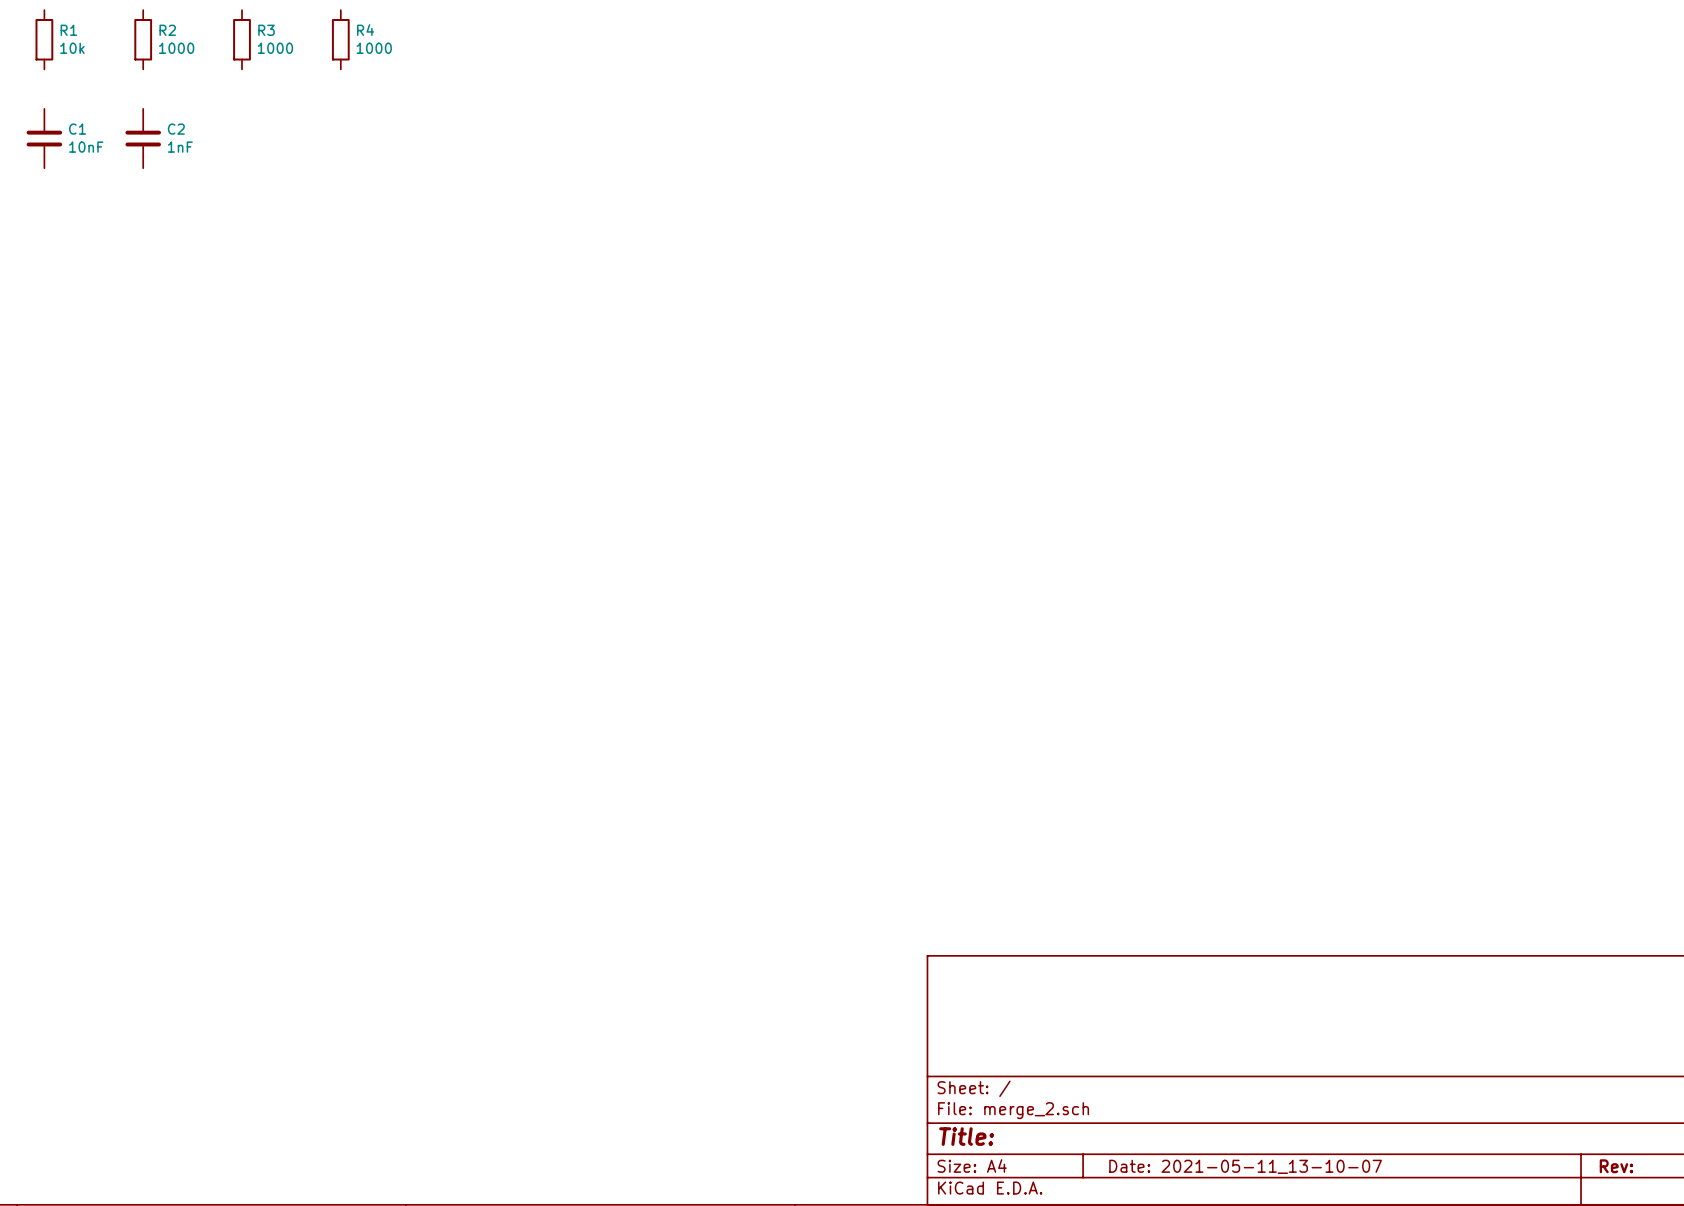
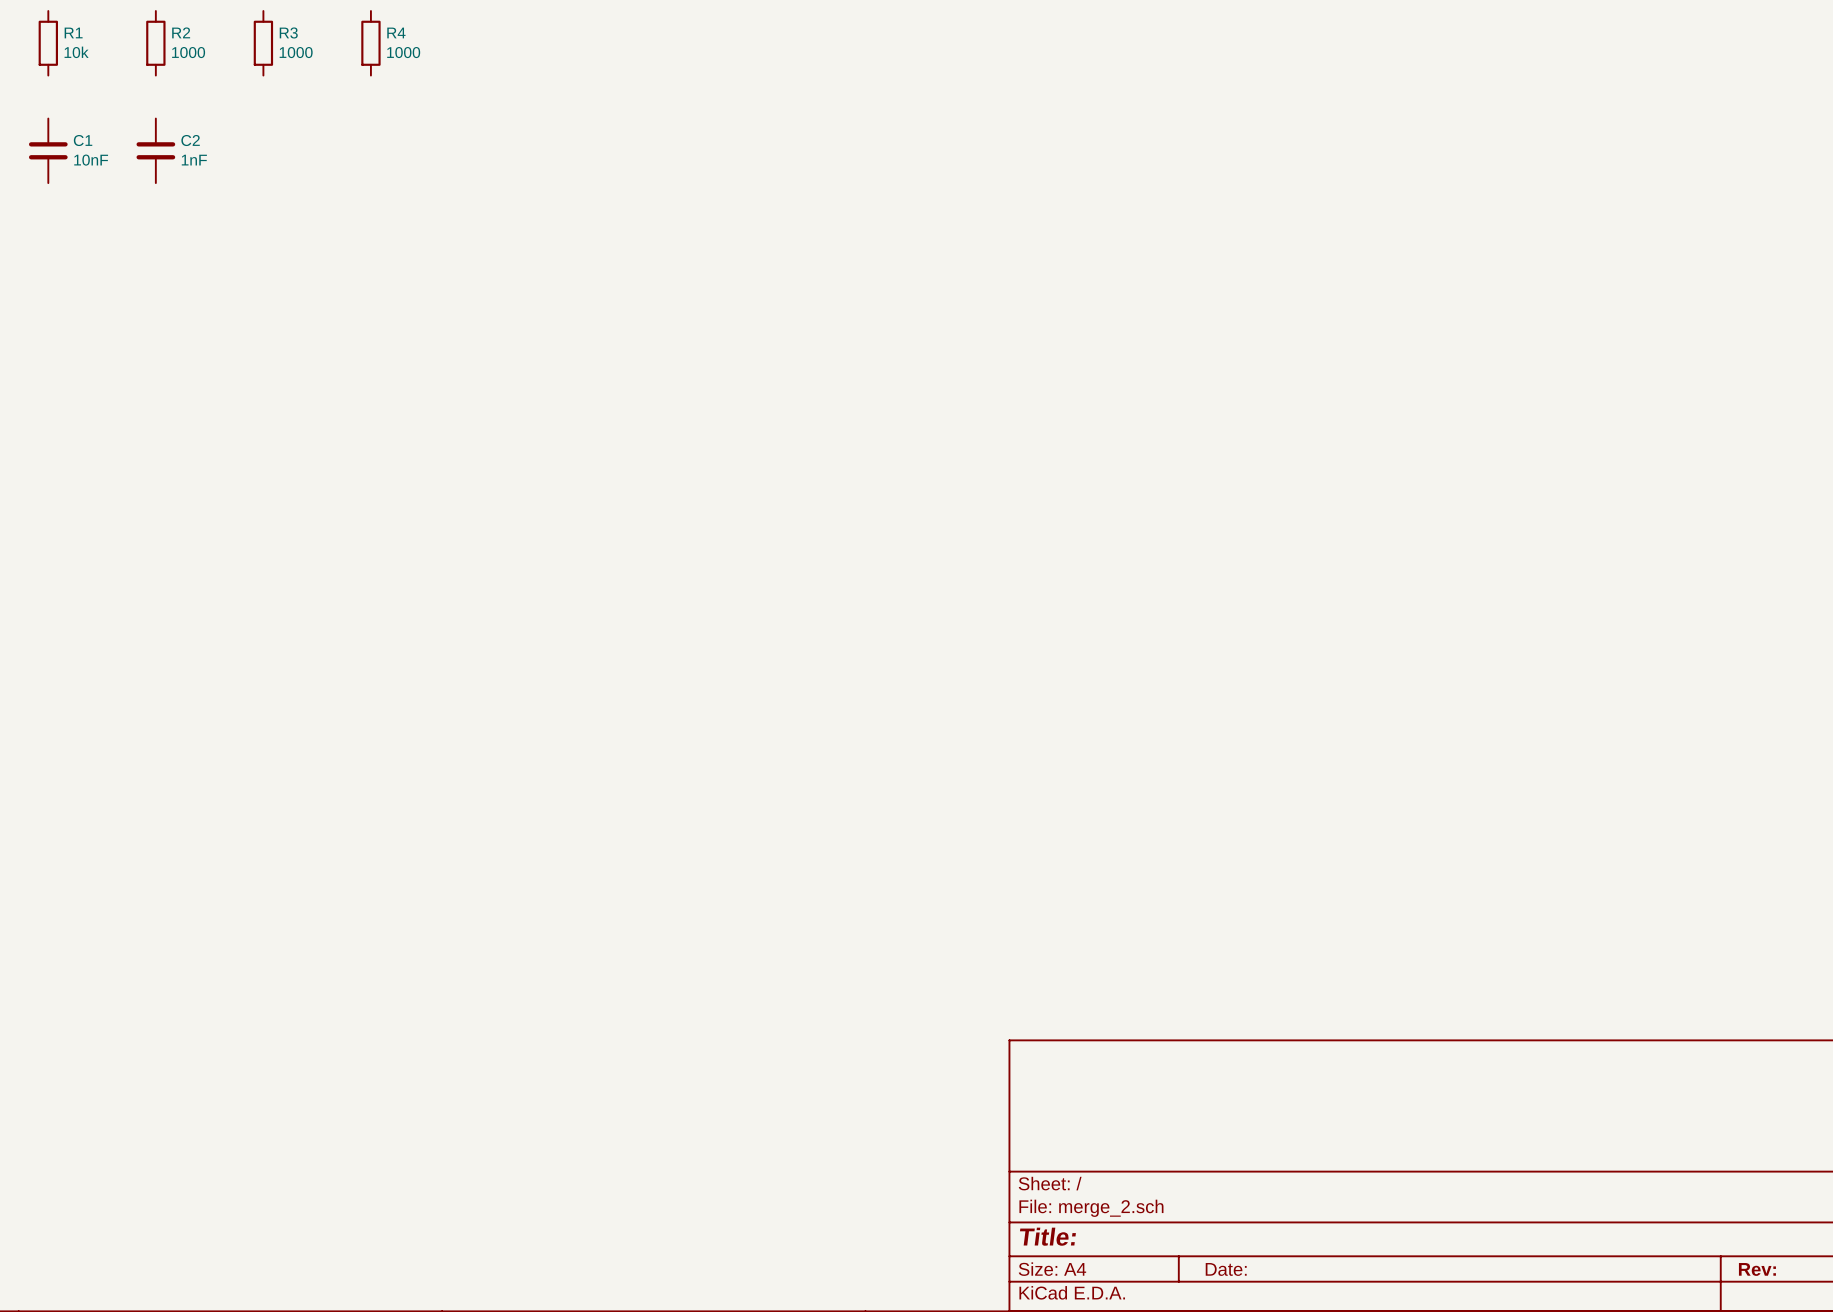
title block: Date: 2021-05-11_13-10-07 (1245, 1166) -> Date: (1226, 1269)

